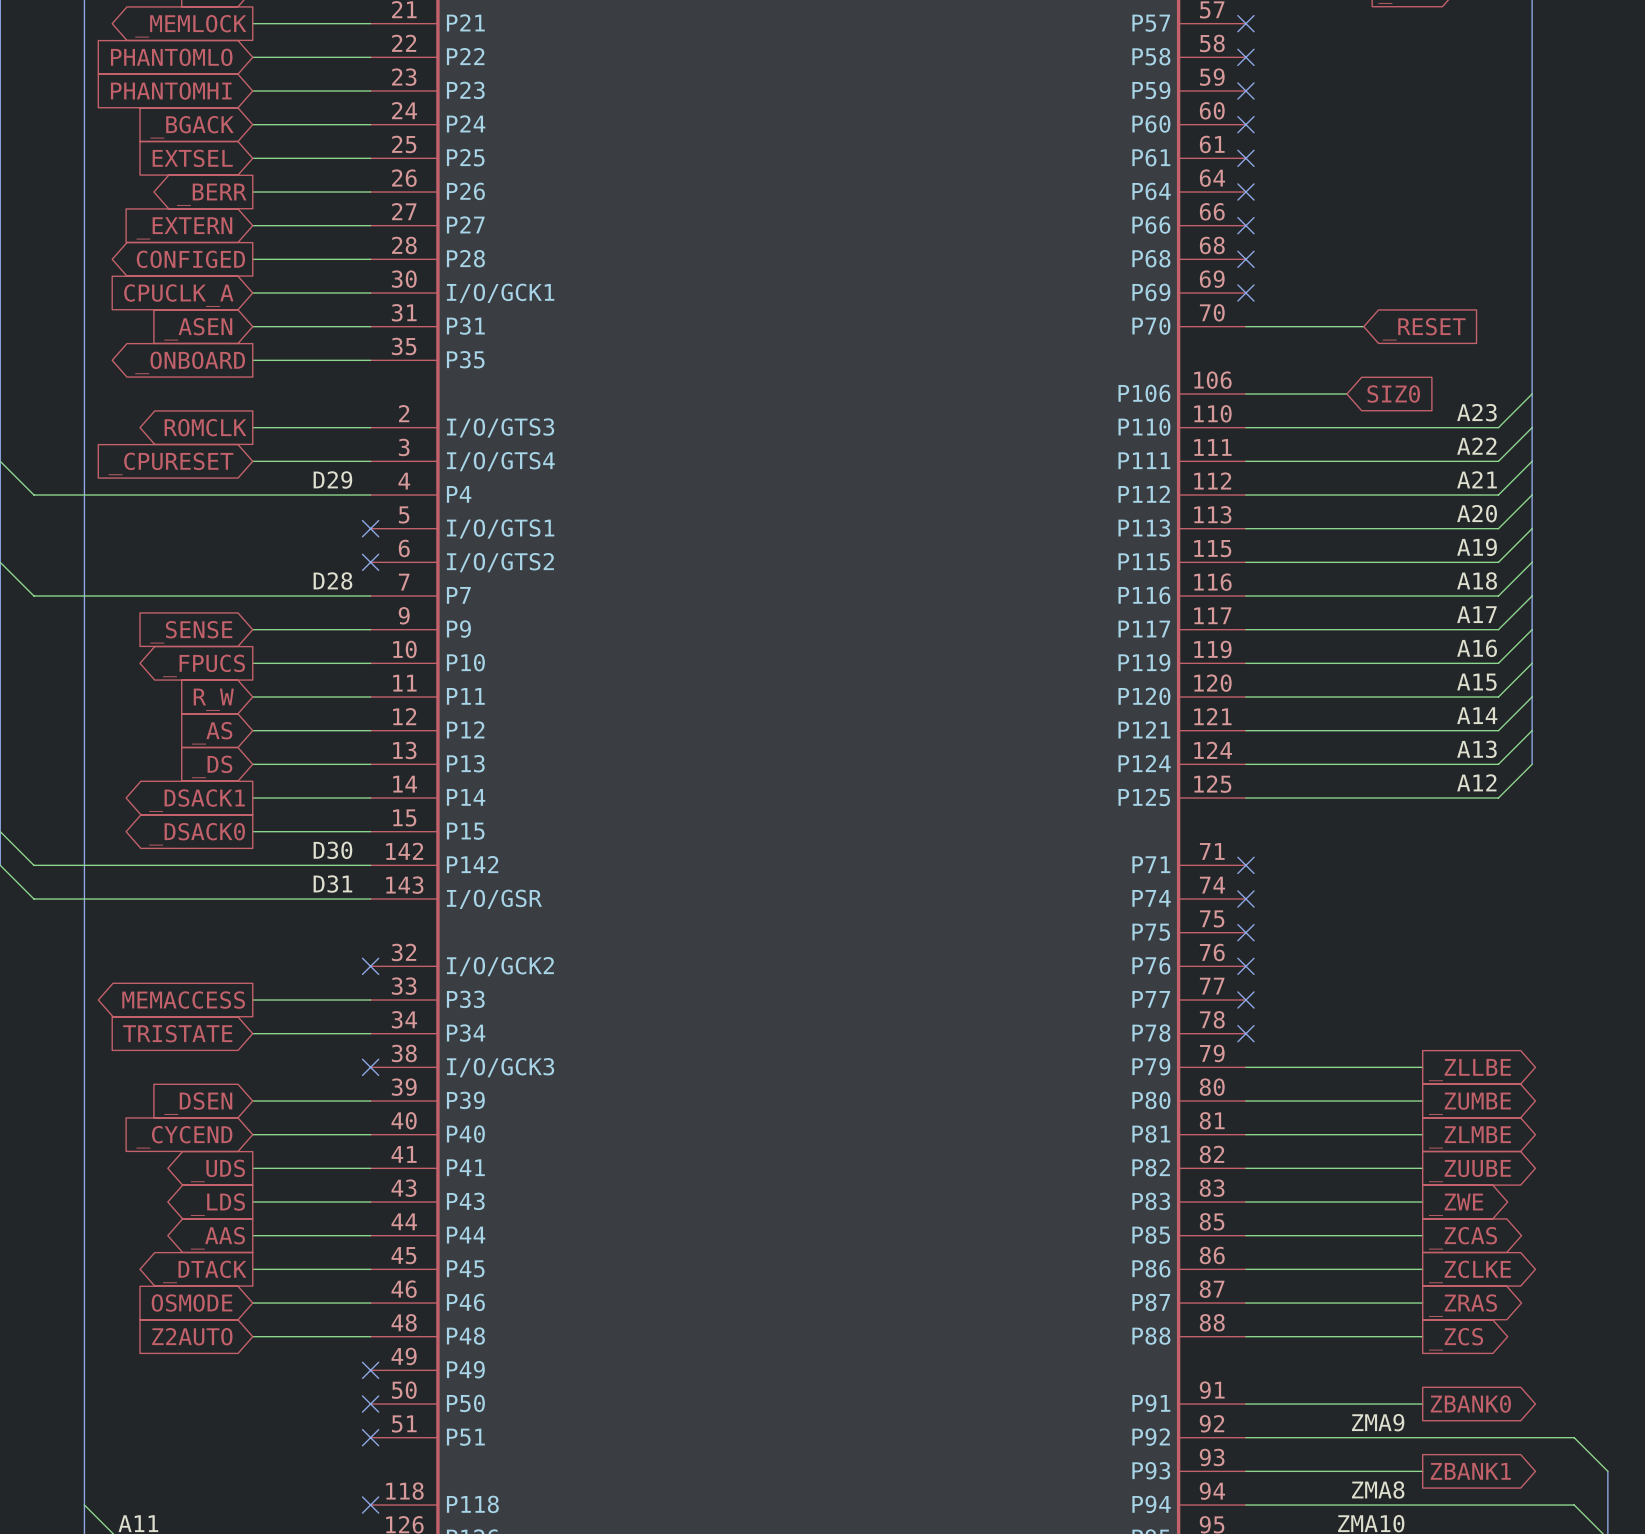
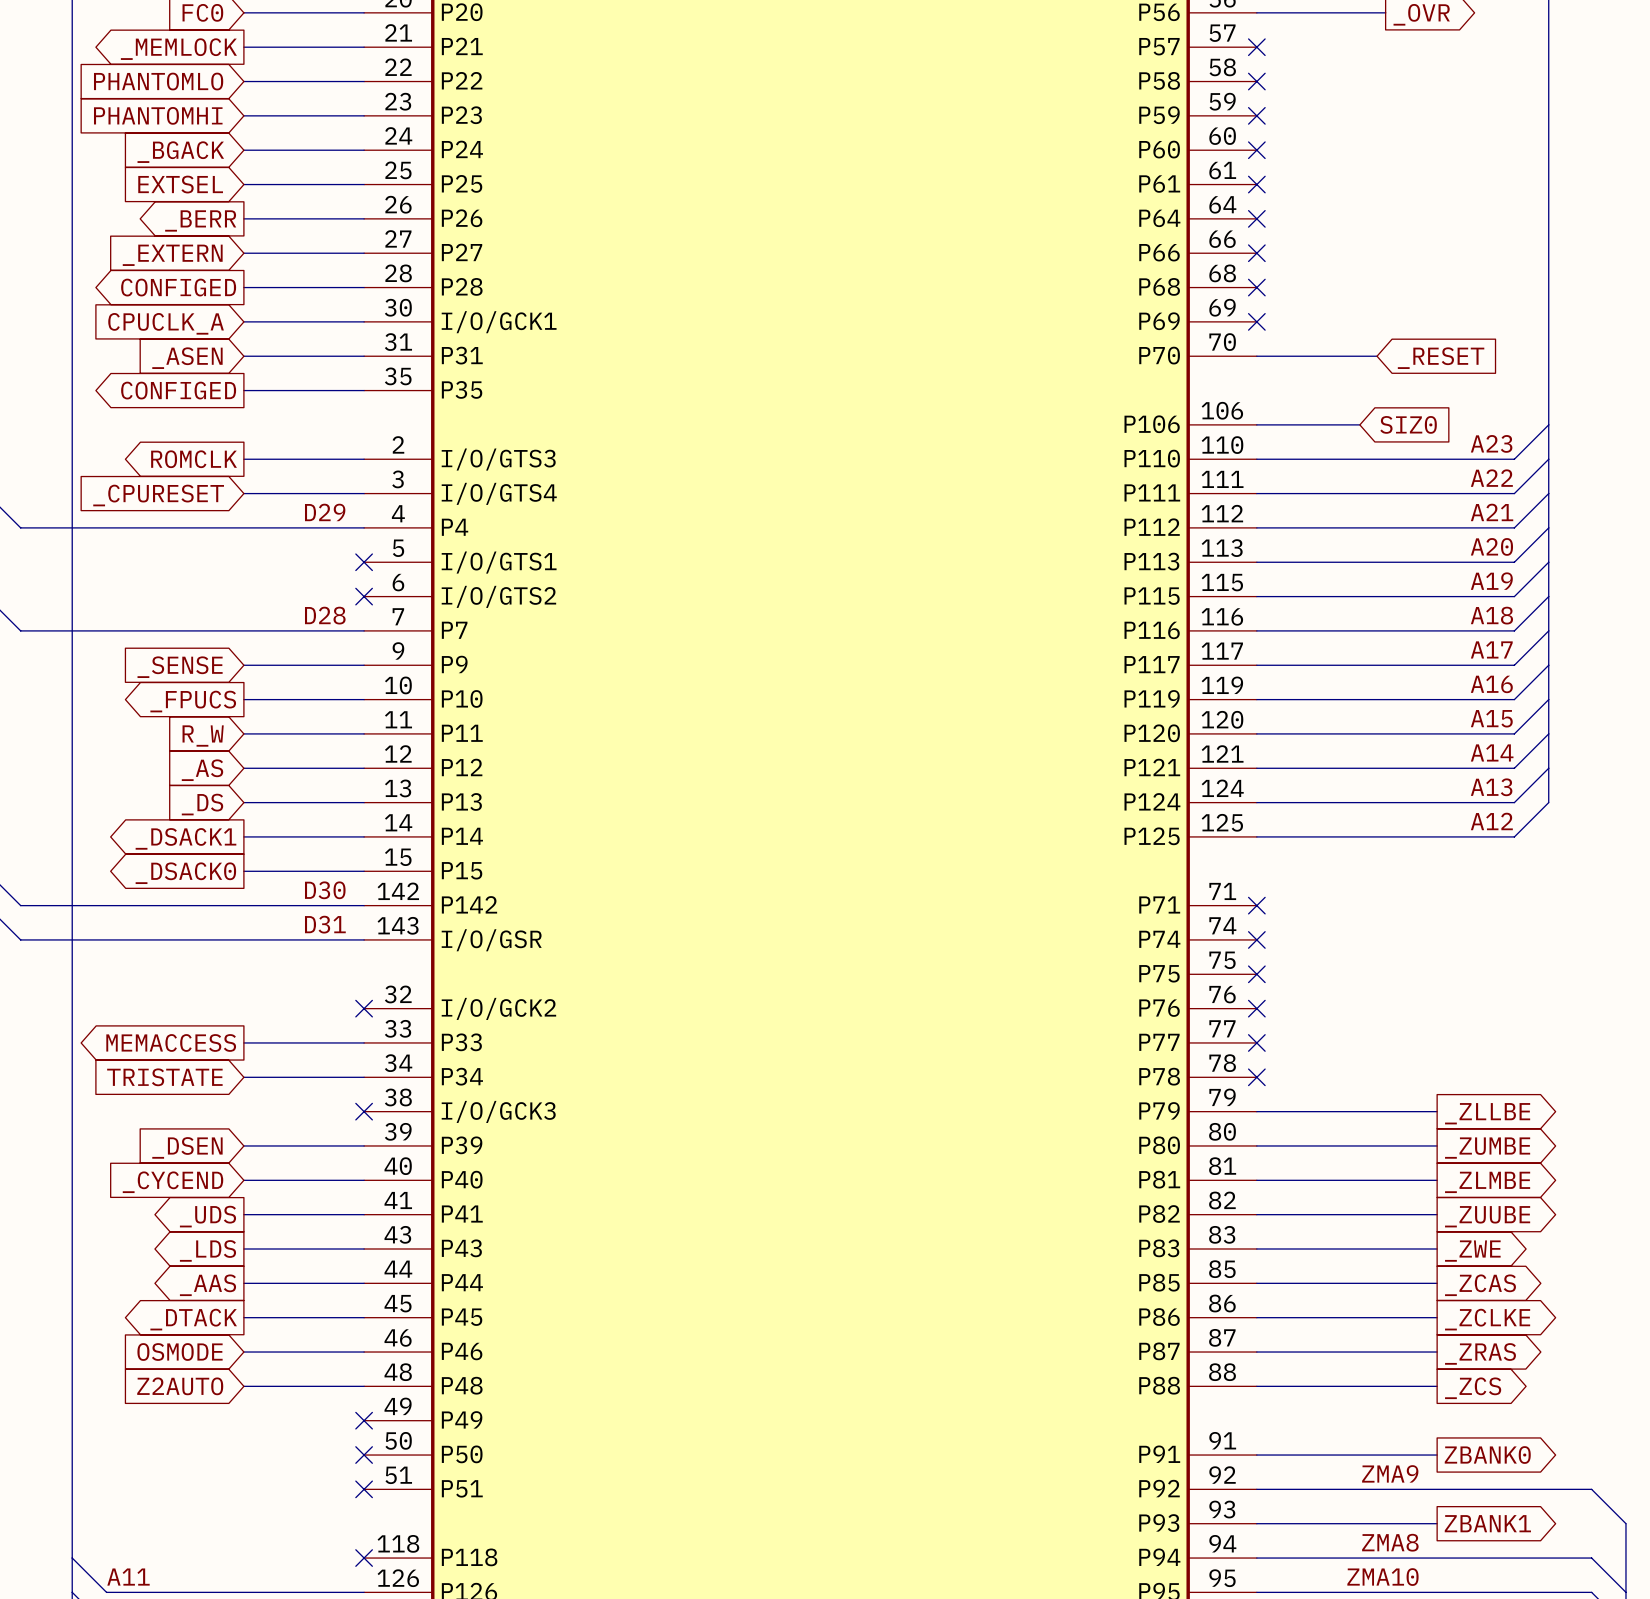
global label: _ONBOARD (190, 362) -> CONFIGED (178, 390)

